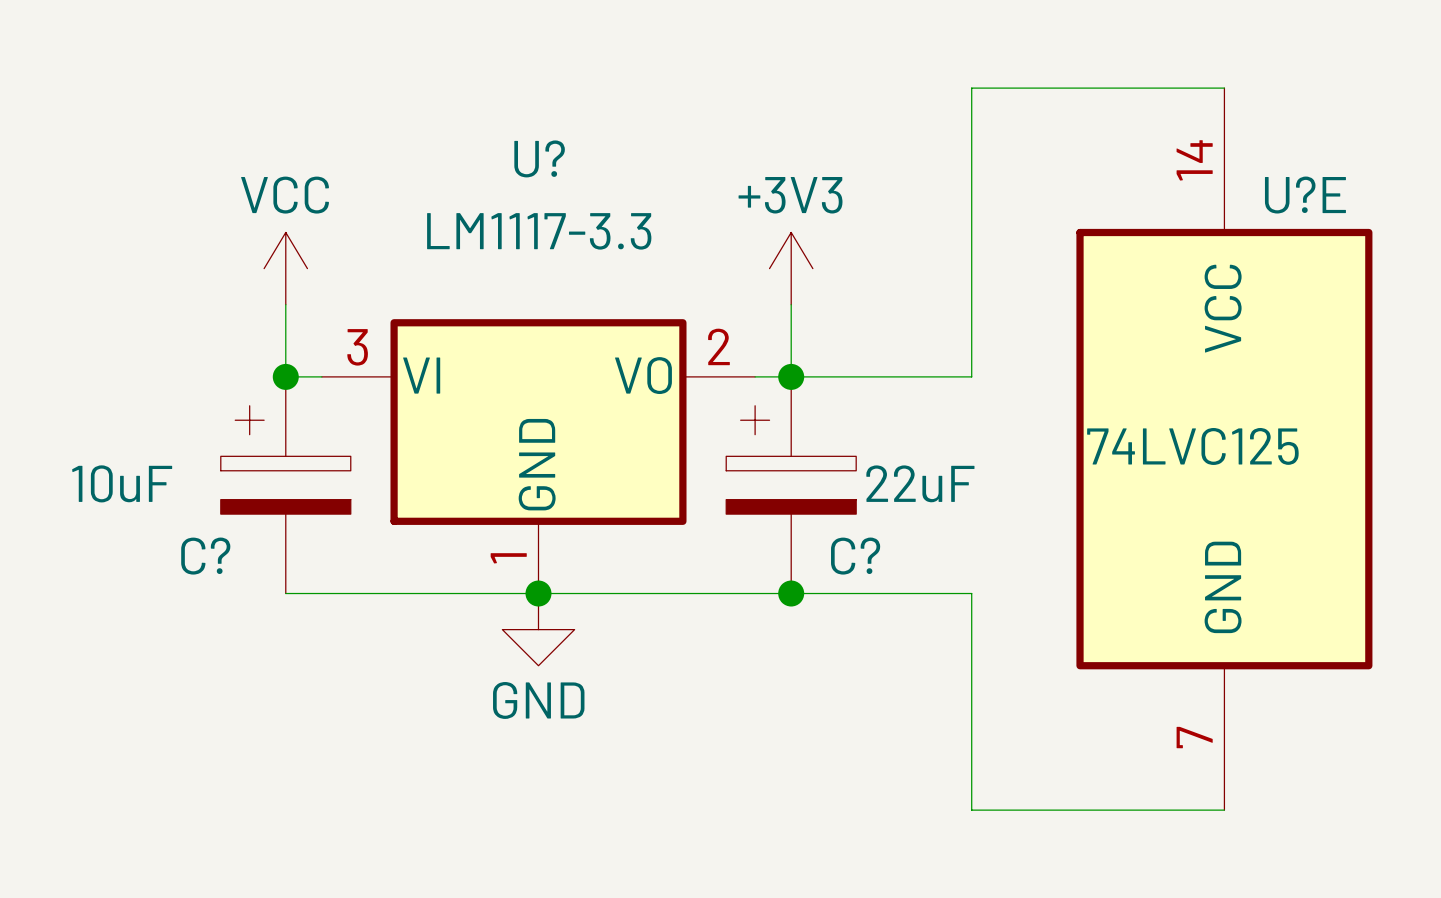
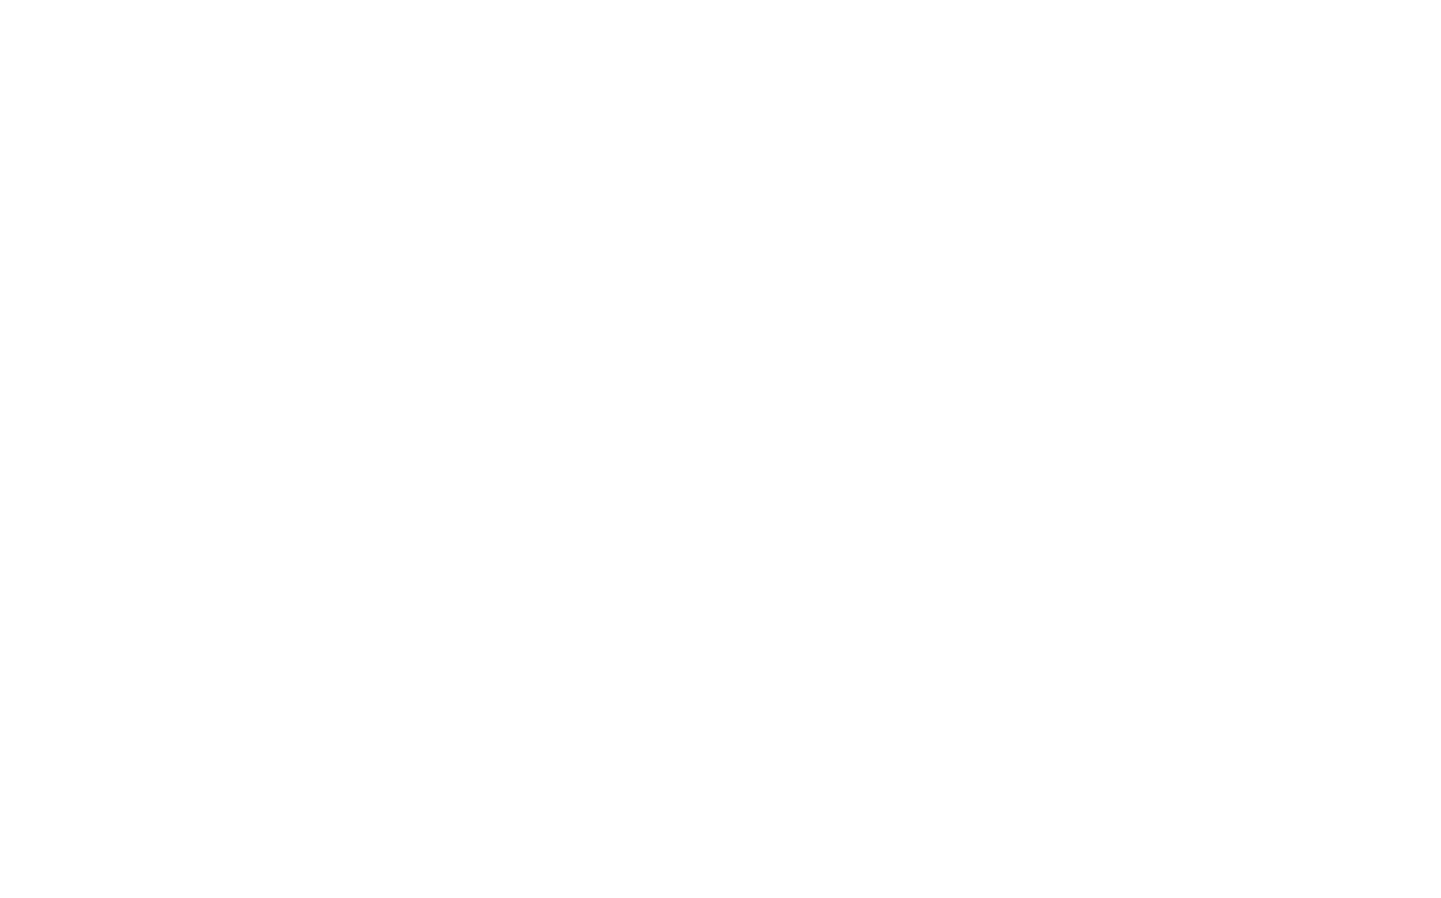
wire: (1224, 88) (971, 88) (971, 376) (755, 376) -> none
power symbol: VCC (285, 268) -> none
power symbol: +3V3 (791, 268) -> none
wire: (285, 304) (285, 376) (321, 376) -> none
wire: (791, 304) (791, 376) -> none
junction: (285, 376) -> none
junction: (791, 376) -> none
U?E: 74LVC125 (1224, 449) -> none
U?: LM1117-3.3 (538, 456) -> none
C?: 10uF (285, 485) -> none
C?: 22uF (791, 485) -> none
wire: (285, 593) (971, 593) (971, 810) (1224, 810) -> none
junction: (538, 593) -> none
junction: (791, 593) -> none
power symbol: GND (538, 629) -> none

